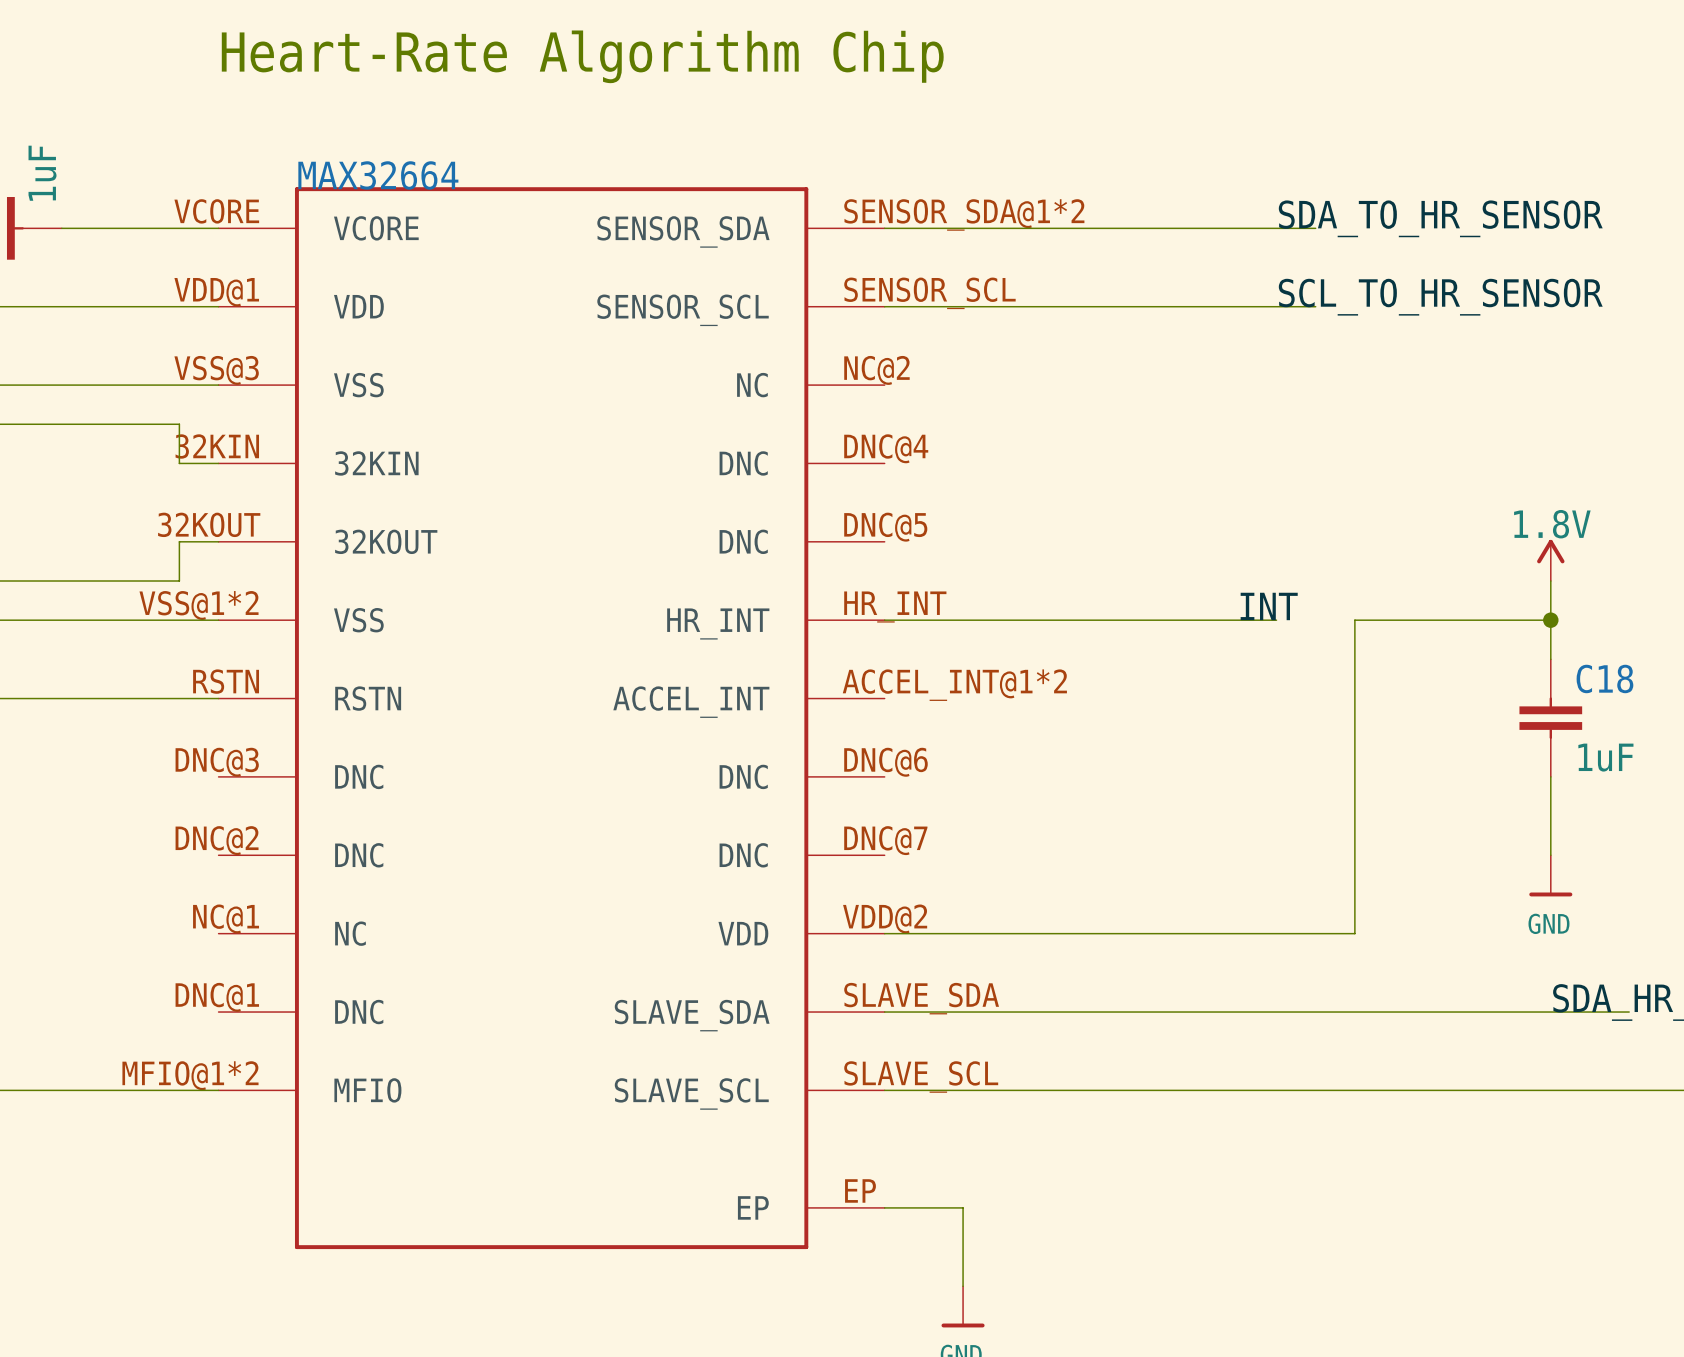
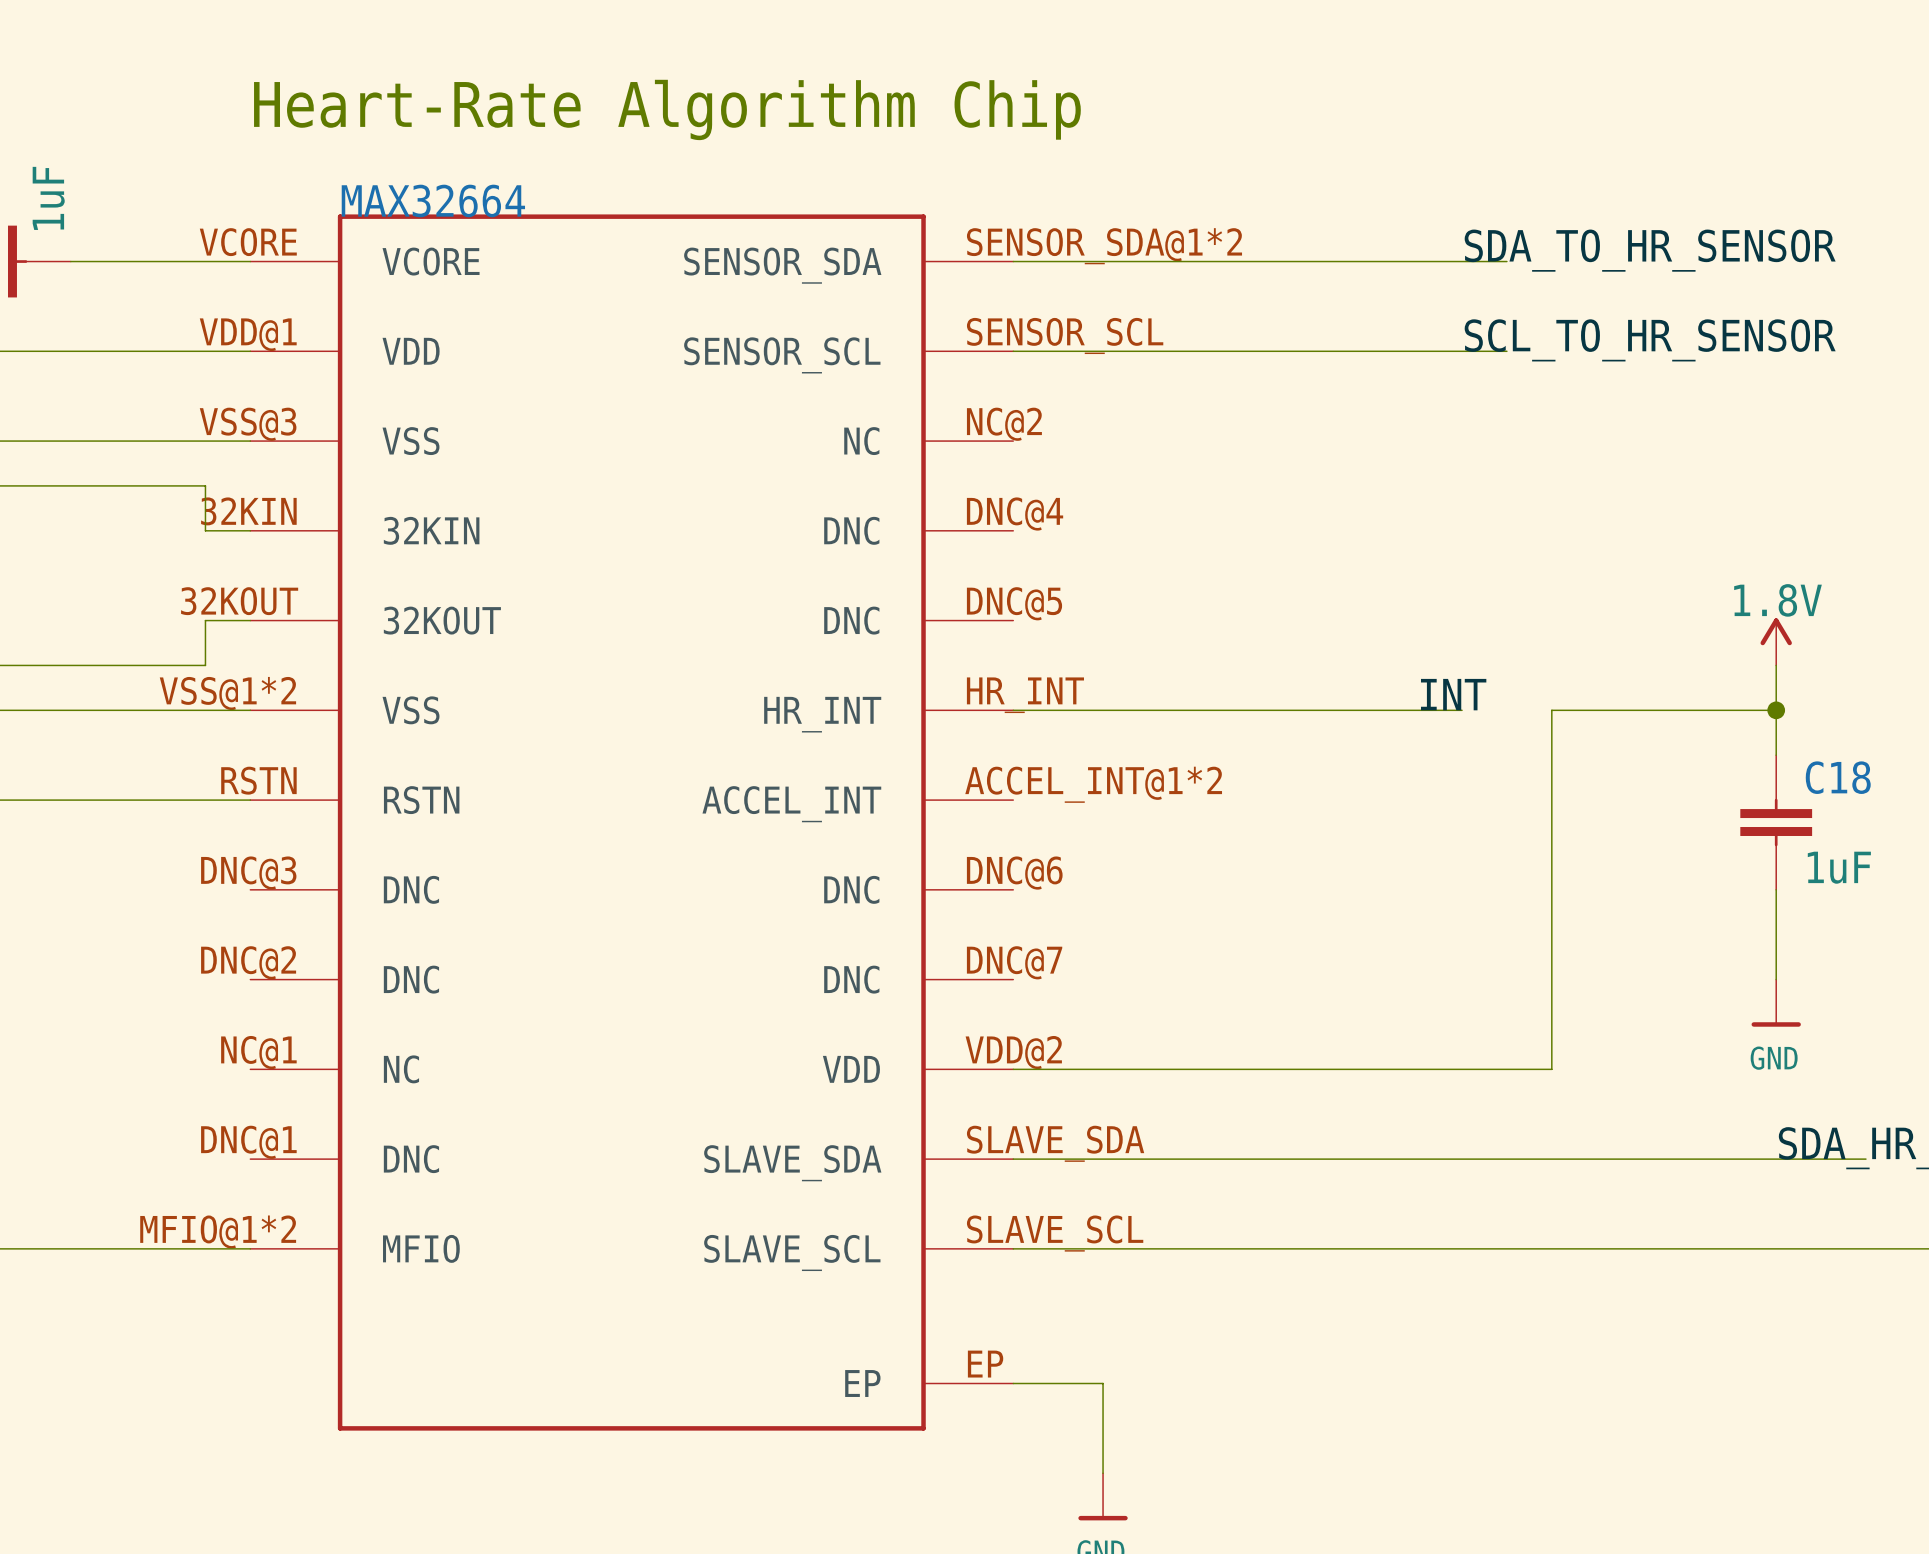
text position: Heart-Rate Algorithm Chip (582, 56) -> Heart-Rate Algorithm Chip (667, 109)

